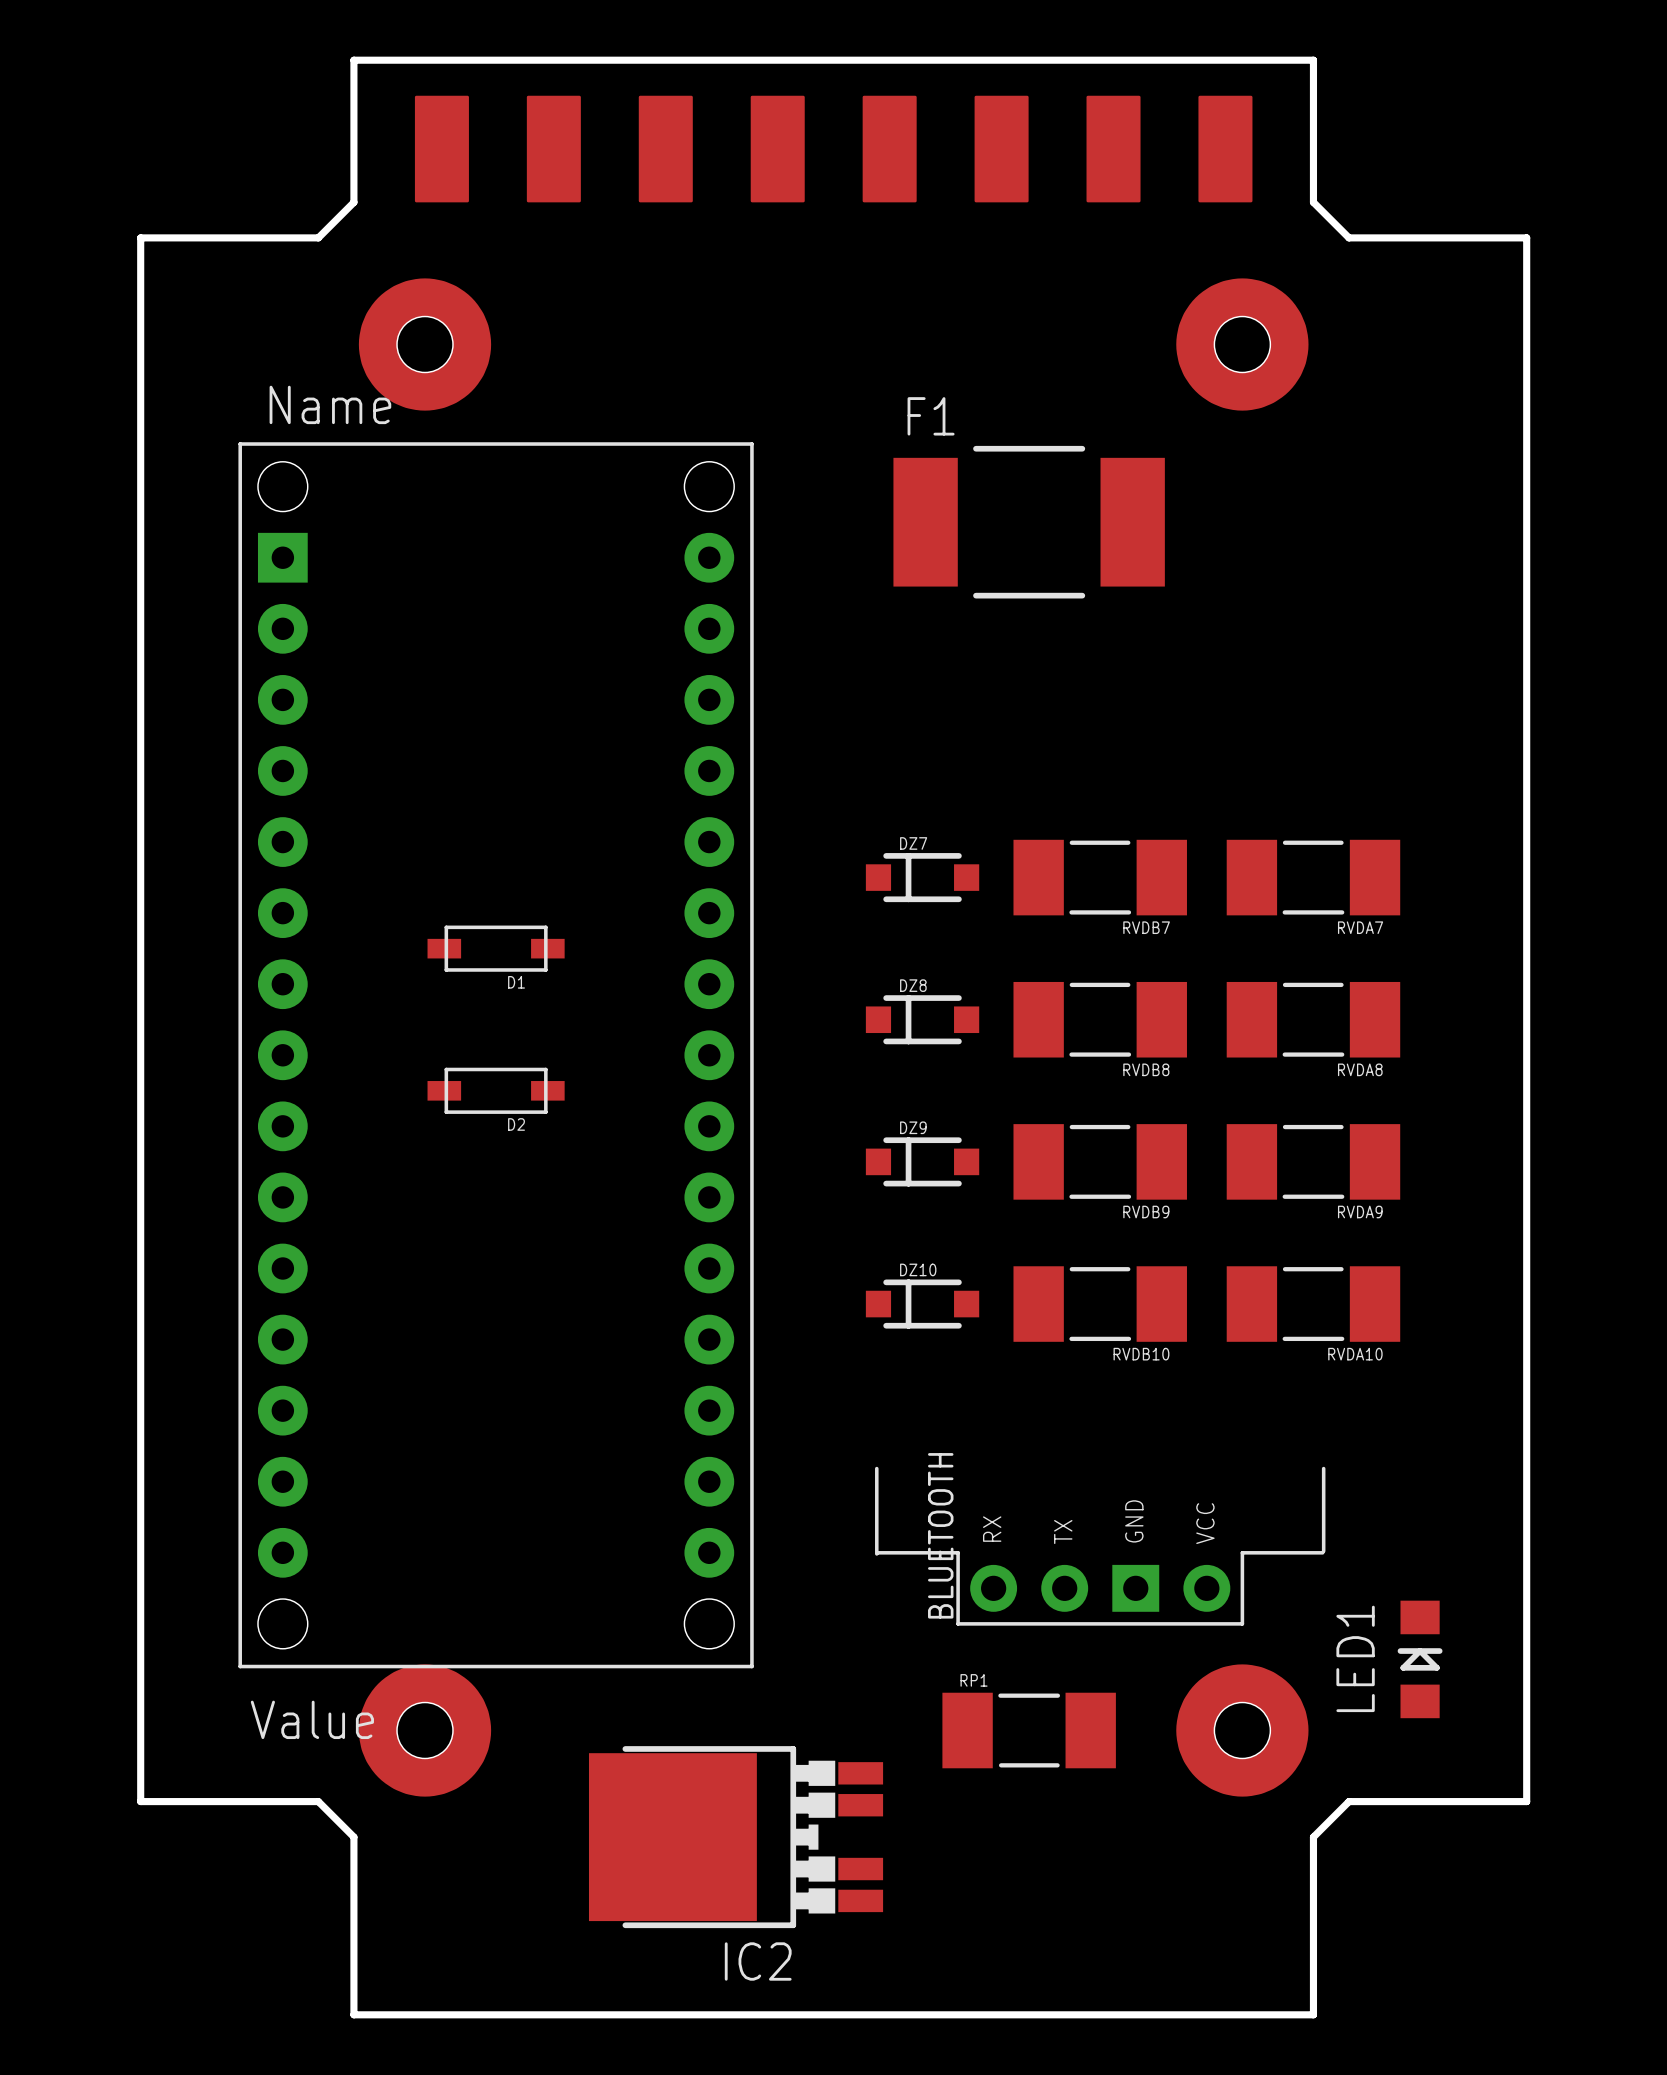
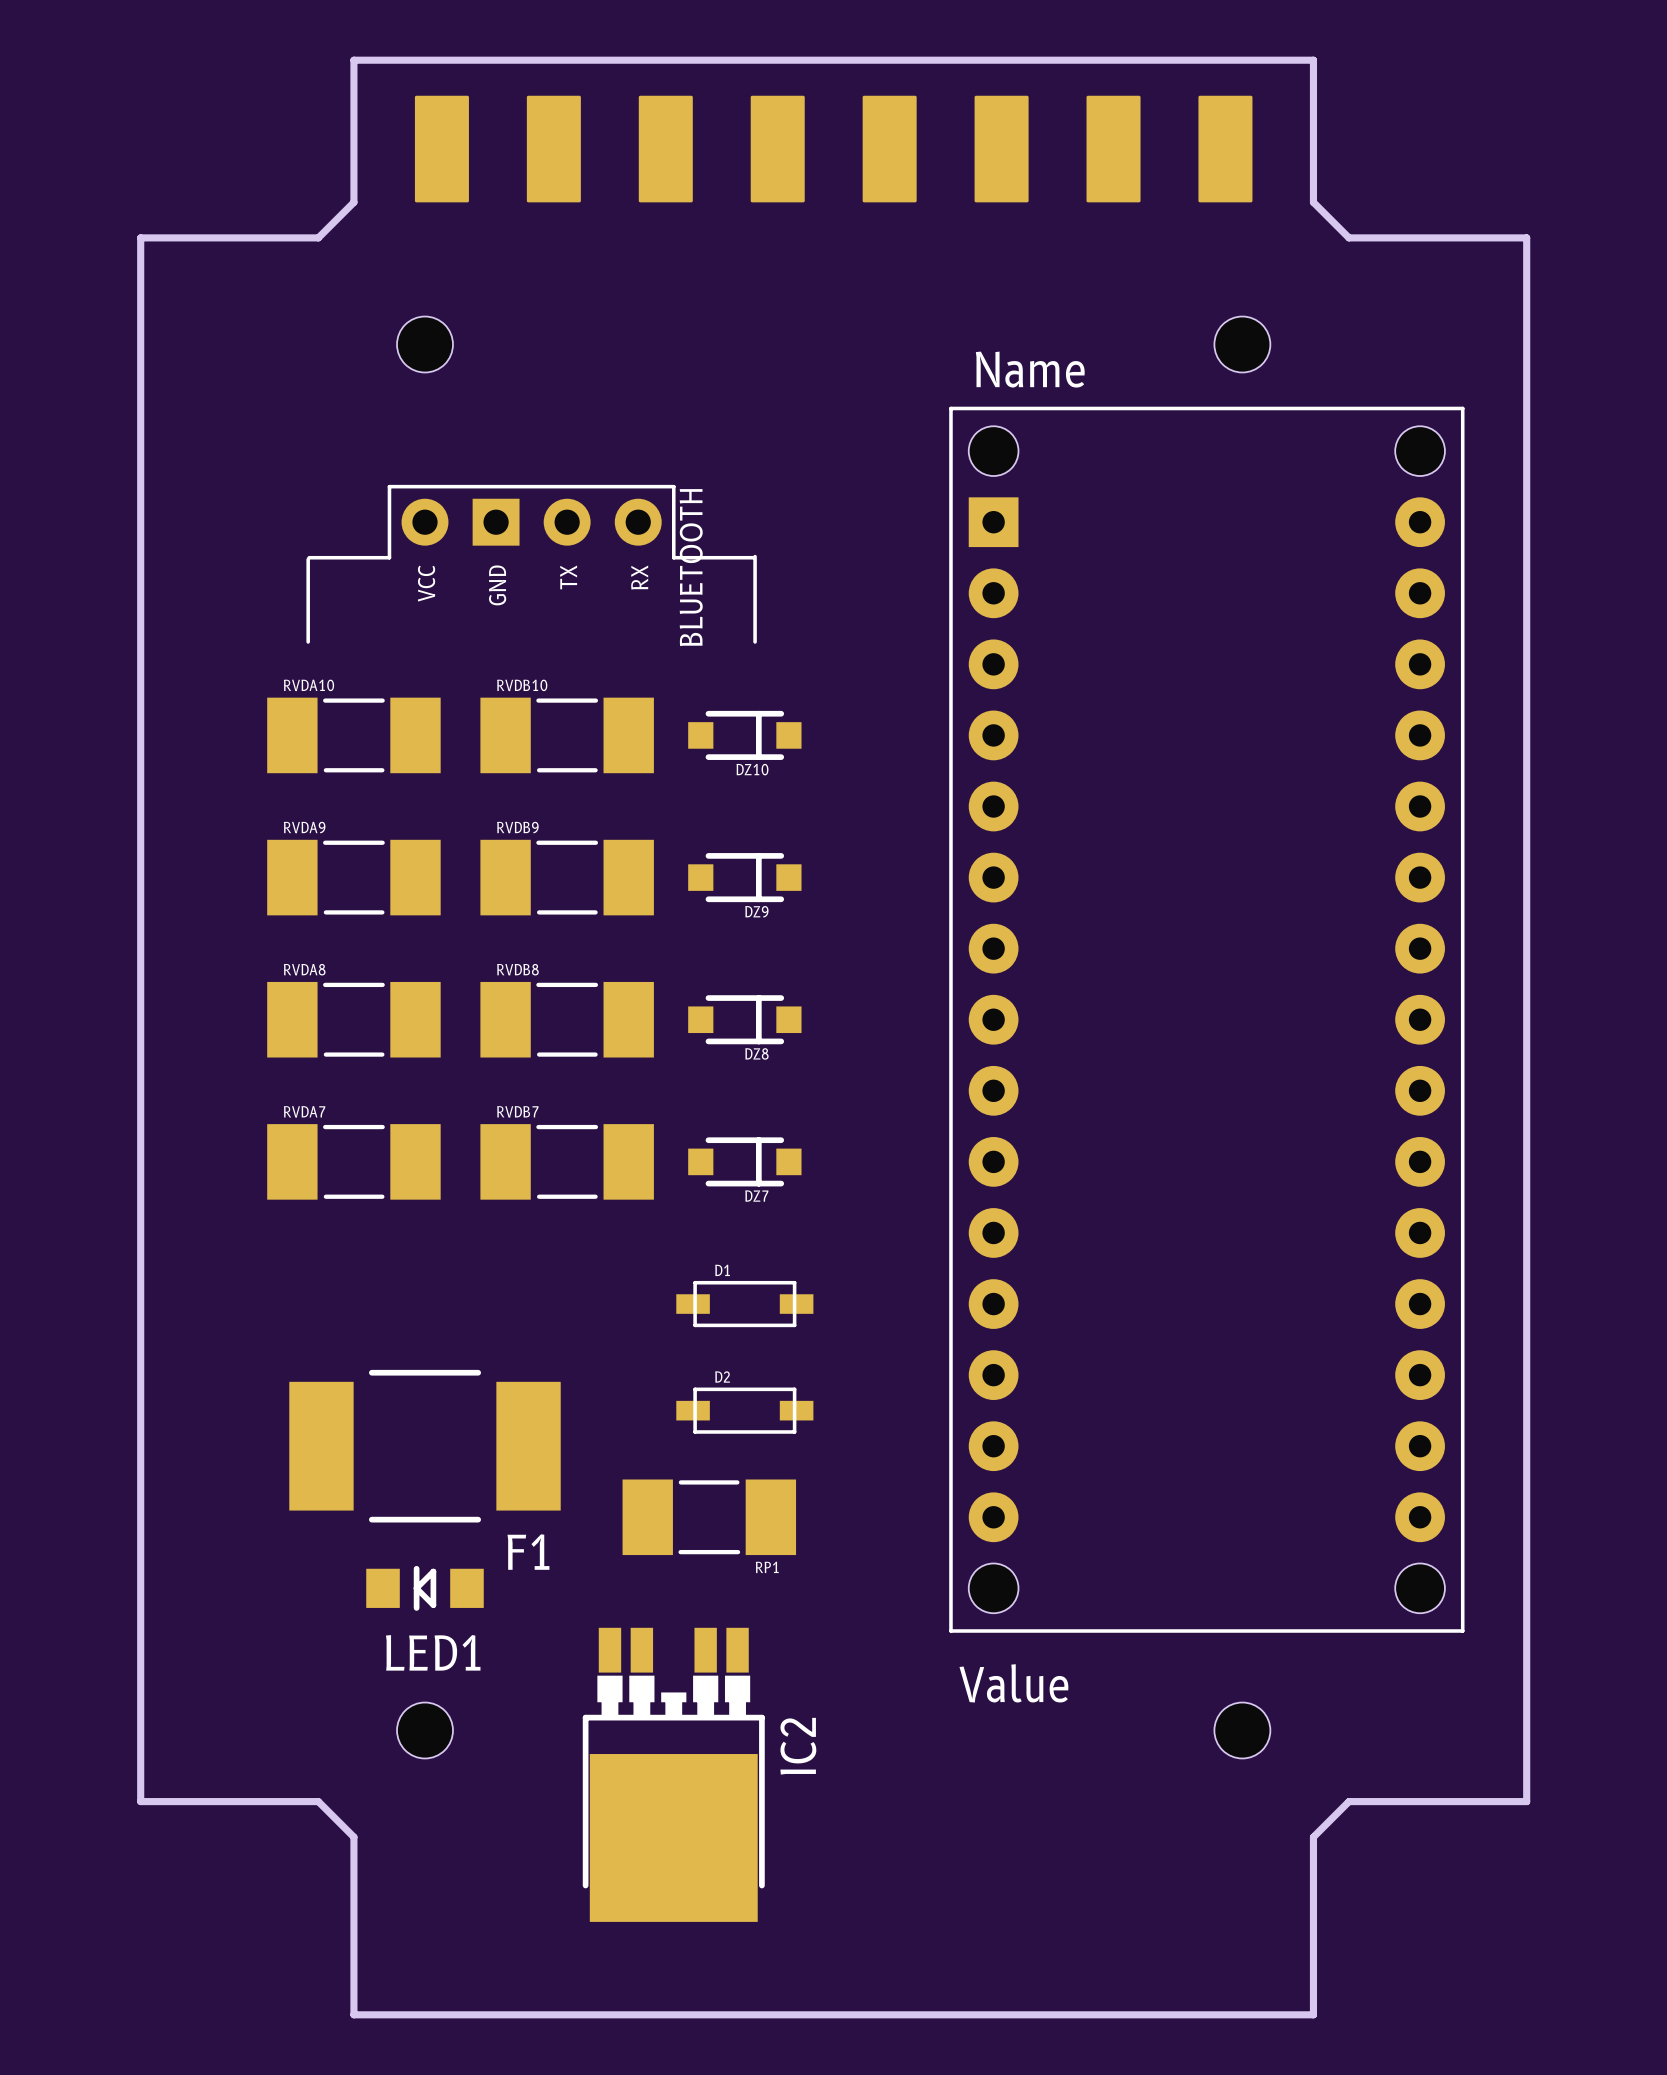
drawing: [358, 278, 492, 411] -> none
drawing: [1176, 278, 1309, 411] -> none
F1 name position: F1 (931, 416) -> F1 (528, 1552)
F1 position: (1029, 522) -> (425, 1446)
BLUETOOTH: none -> (531, 564)
DZ7 rotation: 0° (922, 877) -> 180° (744, 1161)
DZ7 position: (922, 877) -> (744, 1161)
RVDB7 rotation: 0° (1100, 877) -> 180° (567, 1161)
RVDB7 position: (1100, 877) -> (567, 1161)
RVDA7 rotation: 0° (1313, 877) -> 180° (353, 1161)
RVDA7 position: (1313, 877) -> (353, 1161)
D1 position: (496, 948) -> (744, 1304)
D1 name position: D1 (516, 982) -> D1 (722, 1270)
DZ8 rotation: 0° (922, 1019) -> 180° (744, 1019)
DZ8 position: (922, 1019) -> (744, 1019)
RVDB8 rotation: 0° (1100, 1019) -> 180° (567, 1019)
RVDB8 position: (1100, 1019) -> (567, 1019)
part: none -> (1206, 1019)
RVDA8 rotation: 0° (1313, 1019) -> 180° (353, 1019)
RVDA8 position: (1313, 1019) -> (353, 1019)
part: (496, 1055) -> none
D2 position: (496, 1090) -> (744, 1410)
D2 name position: D2 (516, 1124) -> D2 (722, 1377)
DZ9 rotation: 0° (922, 1161) -> 180° (744, 877)
DZ9 position: (922, 1161) -> (744, 877)
RVDB9 rotation: 0° (1100, 1161) -> 180° (567, 877)
RVDB9 position: (1100, 1161) -> (567, 877)
RVDA9 rotation: 0° (1313, 1161) -> 180° (353, 877)
RVDA9 position: (1313, 1161) -> (353, 877)
DZ10 rotation: 0° (922, 1304) -> 180° (744, 735)
DZ10 position: (922, 1304) -> (744, 735)
RVDB10 rotation: 0° (1100, 1304) -> 180° (567, 735)
RVDB10 position: (1100, 1304) -> (567, 735)
RVDA10 rotation: 0° (1313, 1304) -> 180° (353, 735)
RVDA10 position: (1313, 1304) -> (353, 735)
BLUETOOTH: (1100, 1546) -> none
LED1 rotation: 0° (1420, 1659) -> 90° counterclockwise (425, 1588)
LED1 position: (1420, 1659) -> (425, 1588)
drawing: [358, 1664, 492, 1797] -> none
drawing: [1176, 1664, 1309, 1797] -> none
RP1 rotation: 0° (1029, 1730) -> 180° (709, 1517)
RP1 position: (1029, 1730) -> (709, 1517)
IC2 rotation: 0° (736, 1837) -> 90° counterclockwise (673, 1774)

